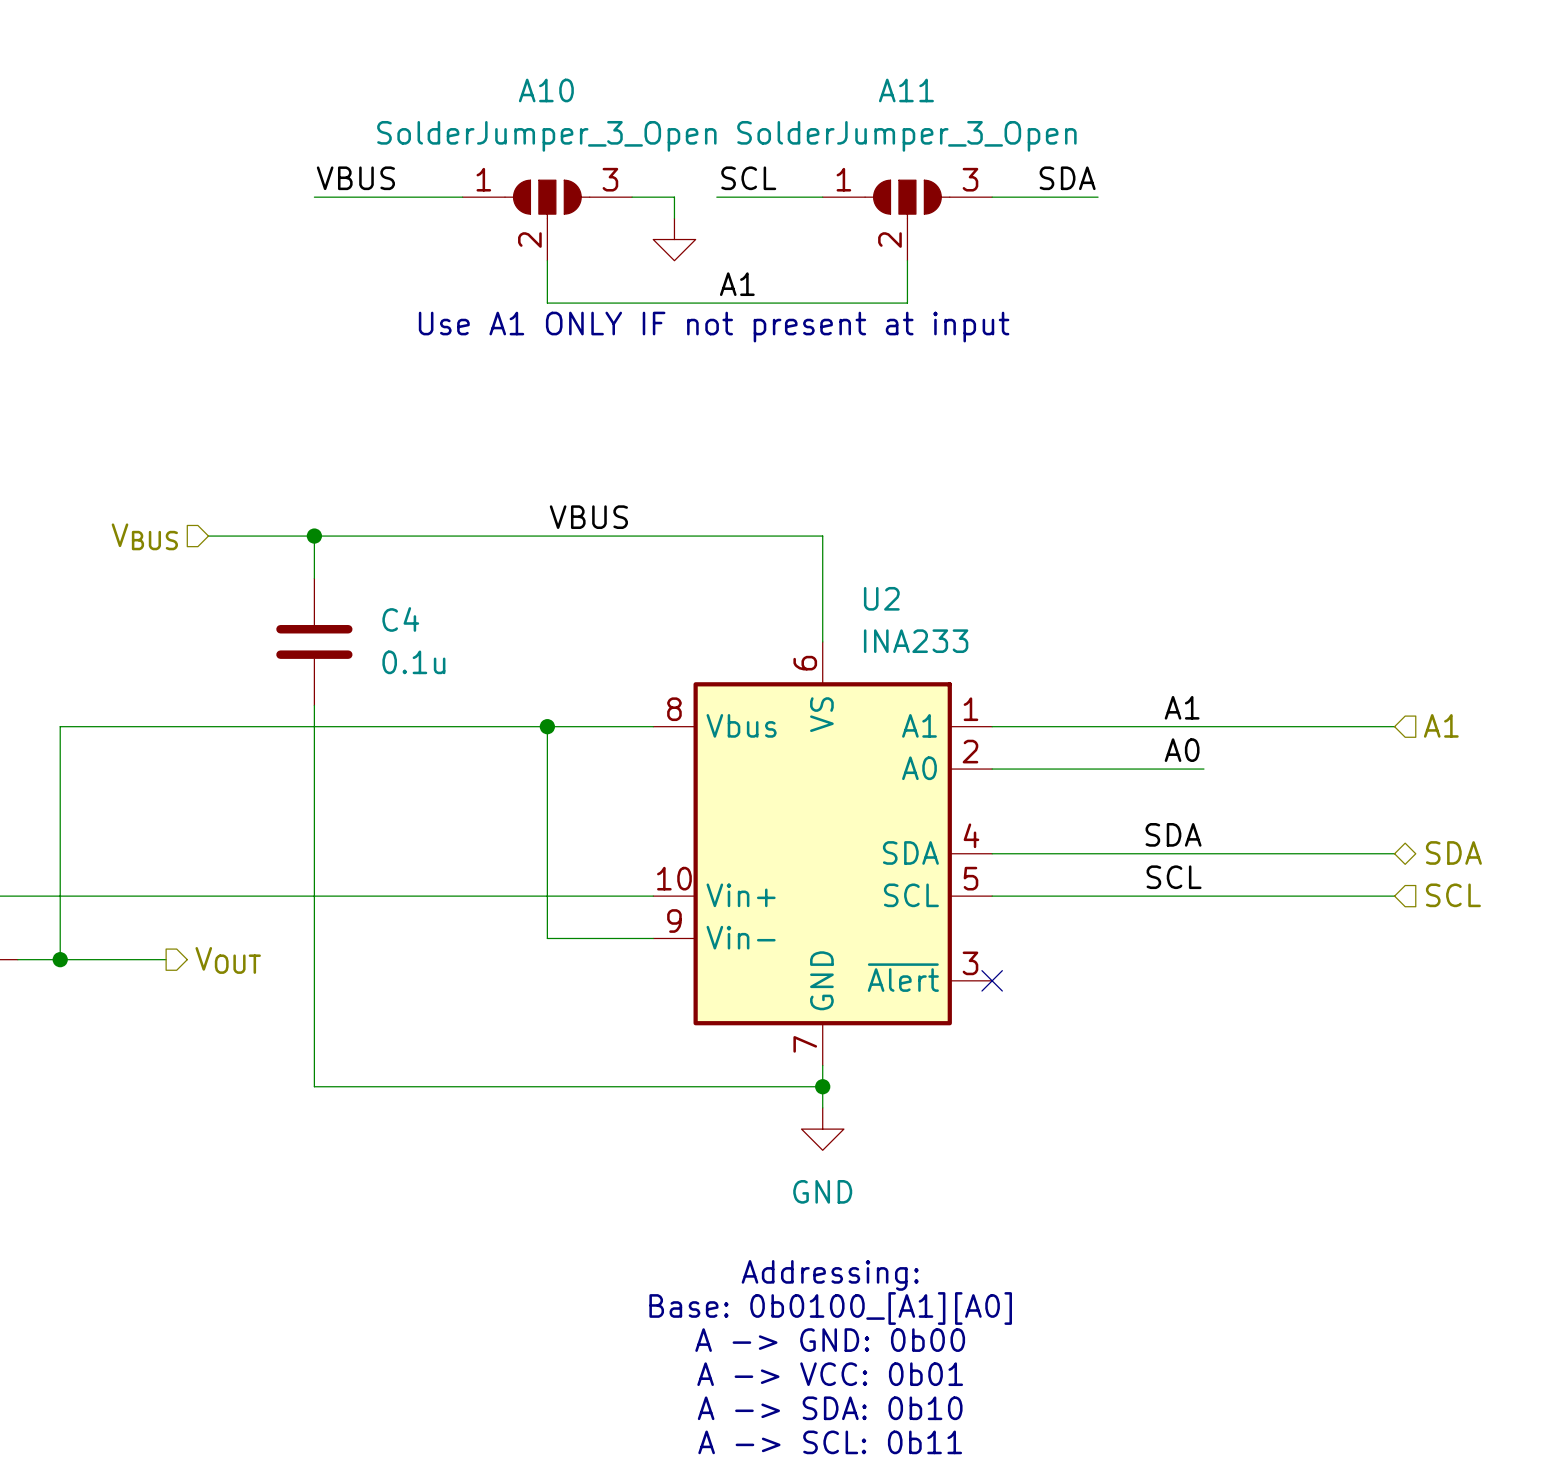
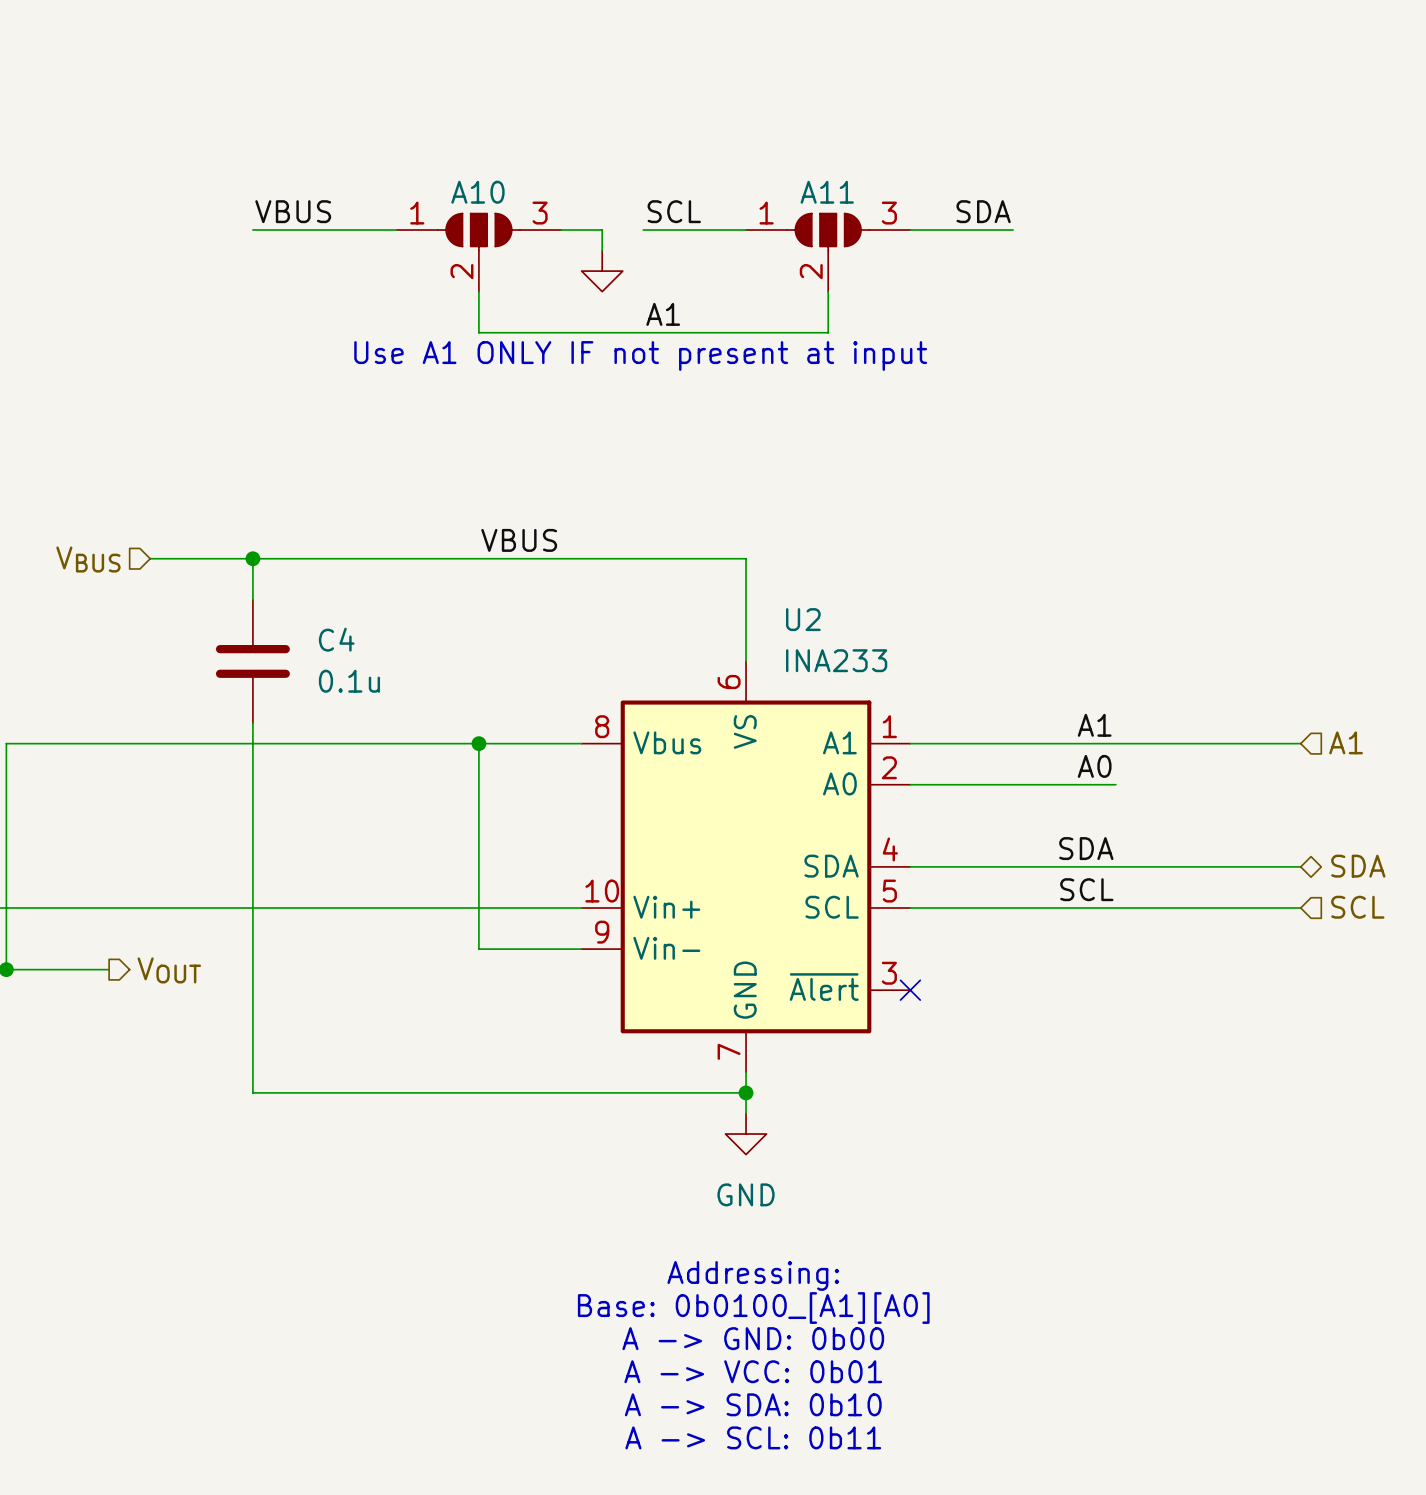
A10 name position: A10 (546, 90) -> A10 (477, 192)
A11 name position: A11 (906, 90) -> A11 (827, 192)
A10 value: SolderJumper_3_Open (546, 136) -> none
A11 value: SolderJumper_3_Open (906, 136) -> none

